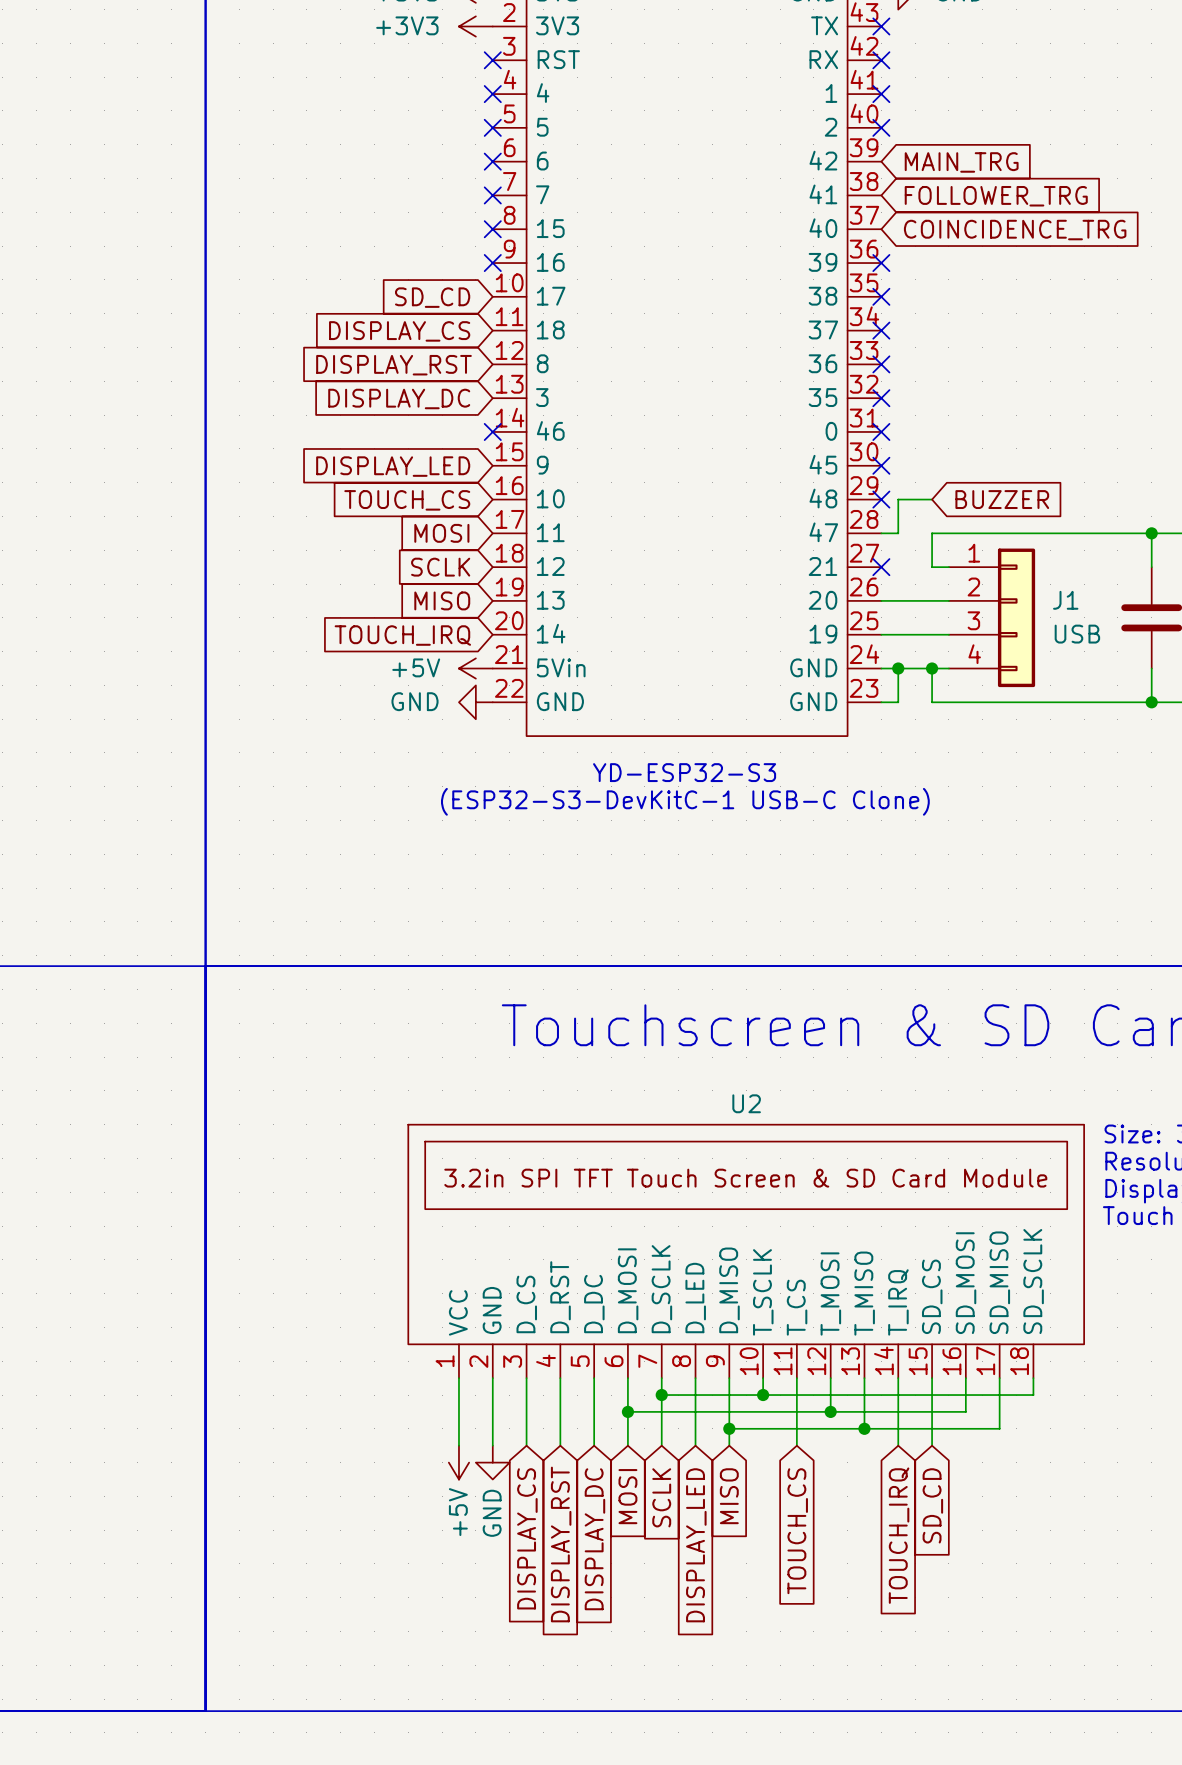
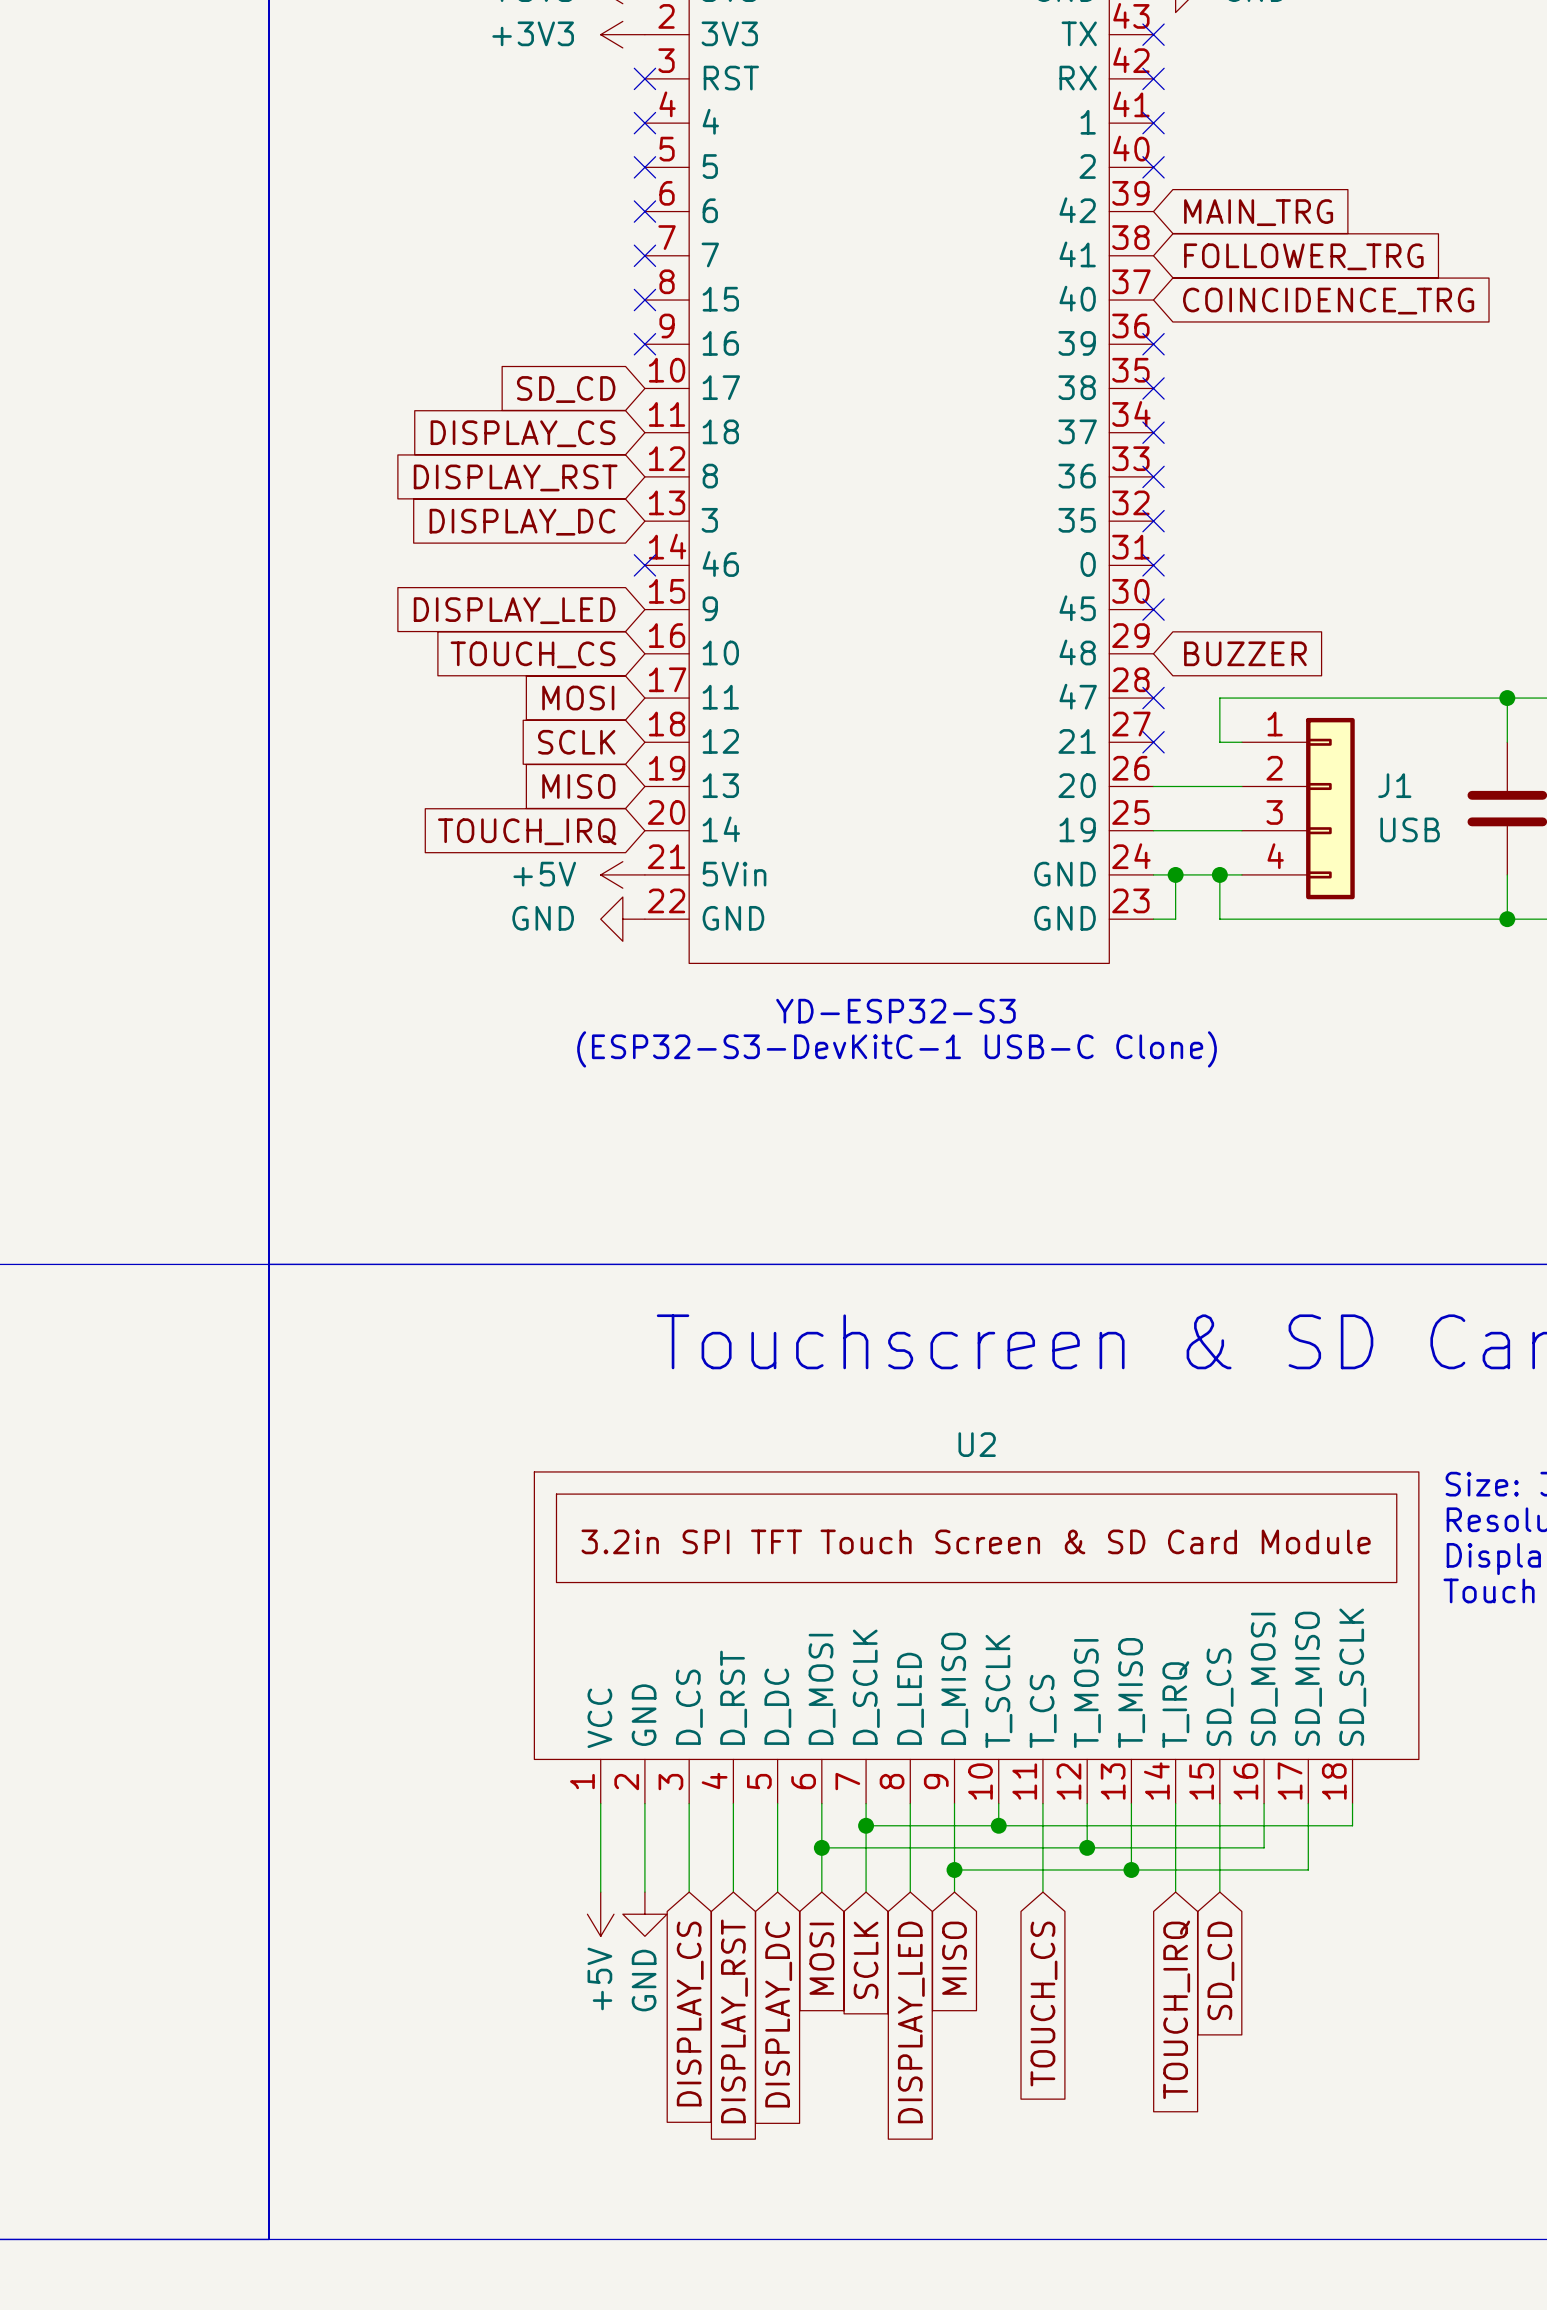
no-connect mark position: (881, 499) -> (1153, 698)
wire: (932, 499) (898, 499) (898, 533) (881, 533) -> none
global label position: BUZZER (1002, 499) -> BUZZER (1245, 653)

